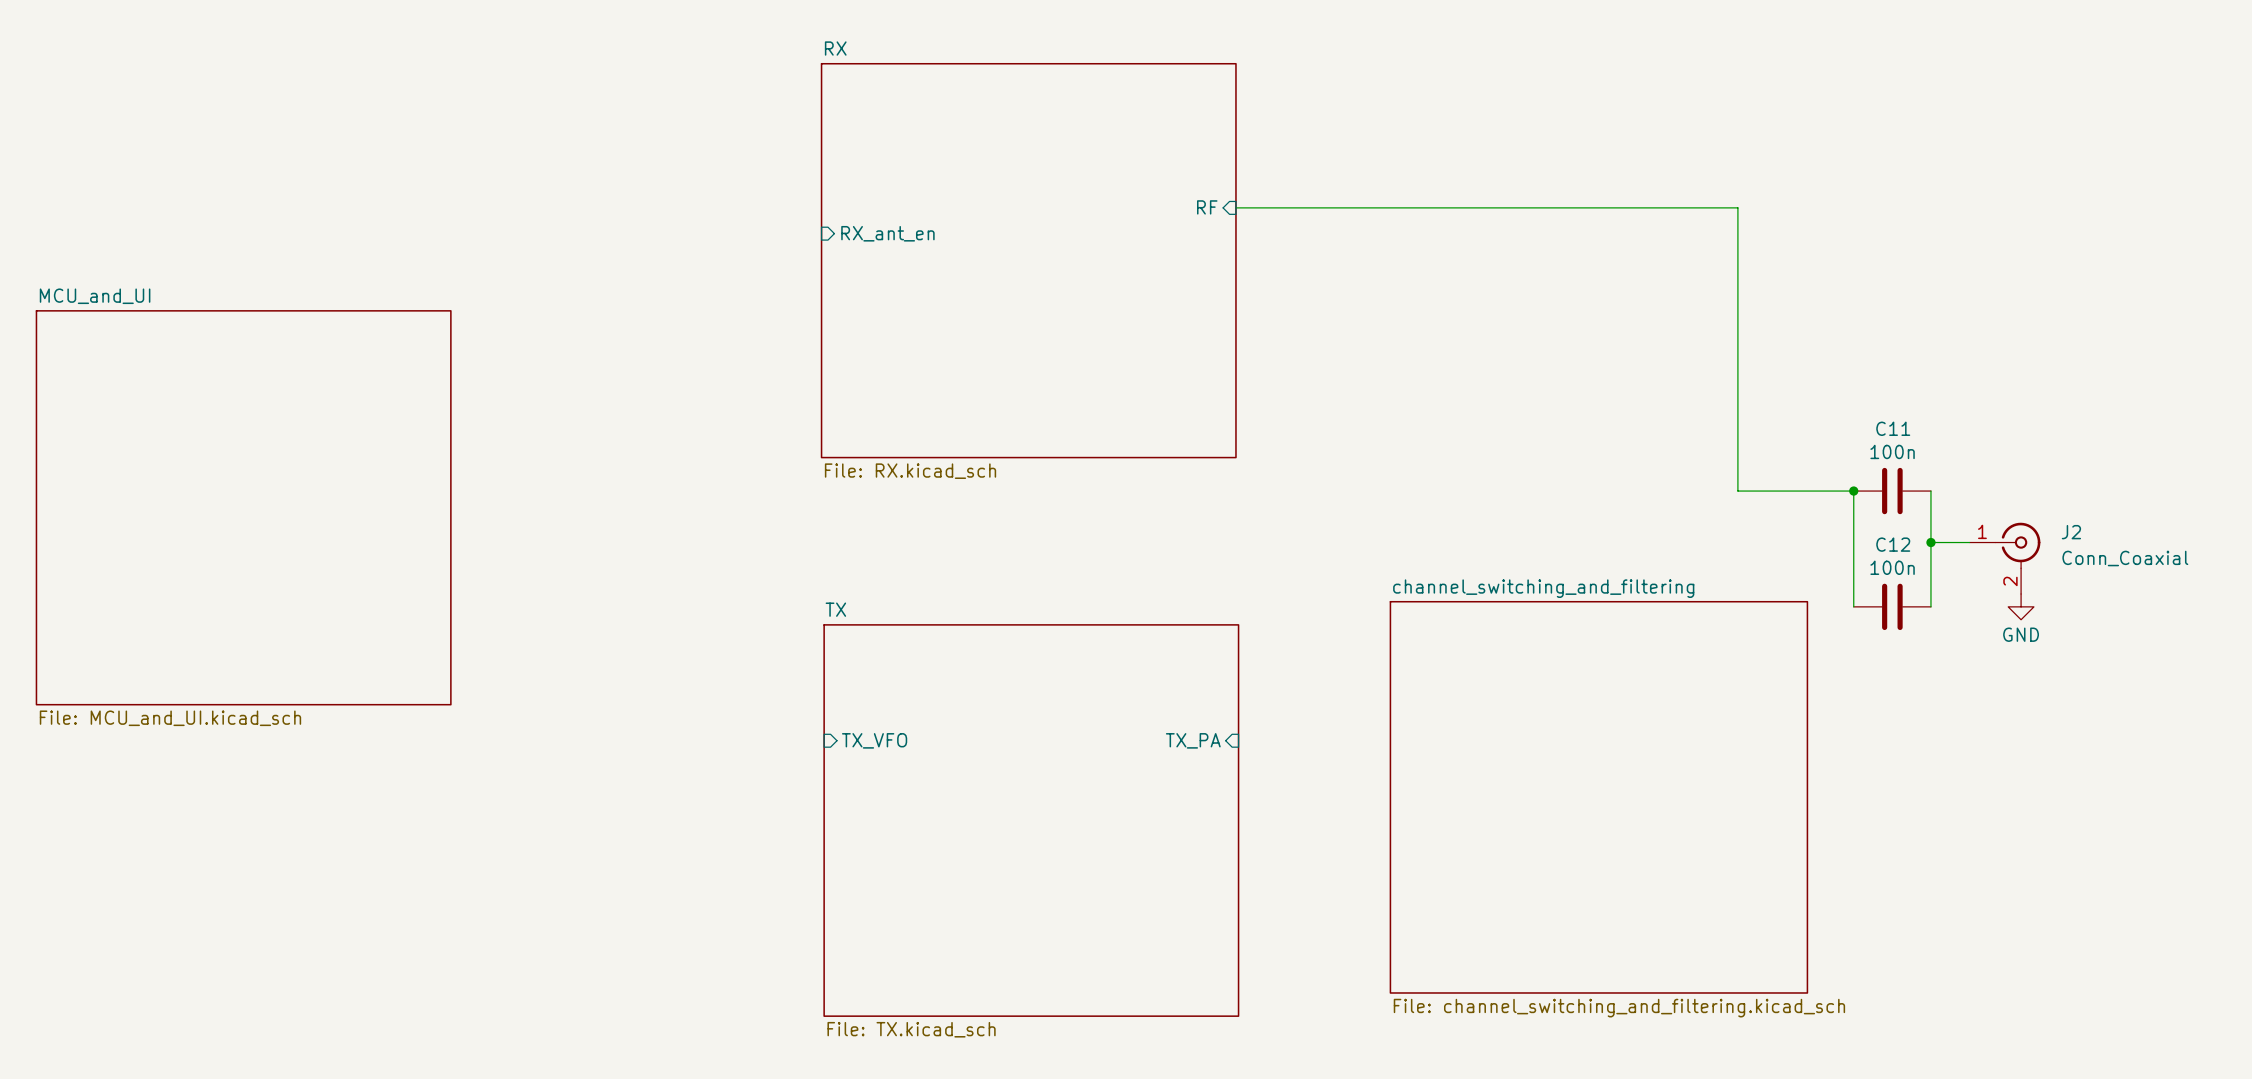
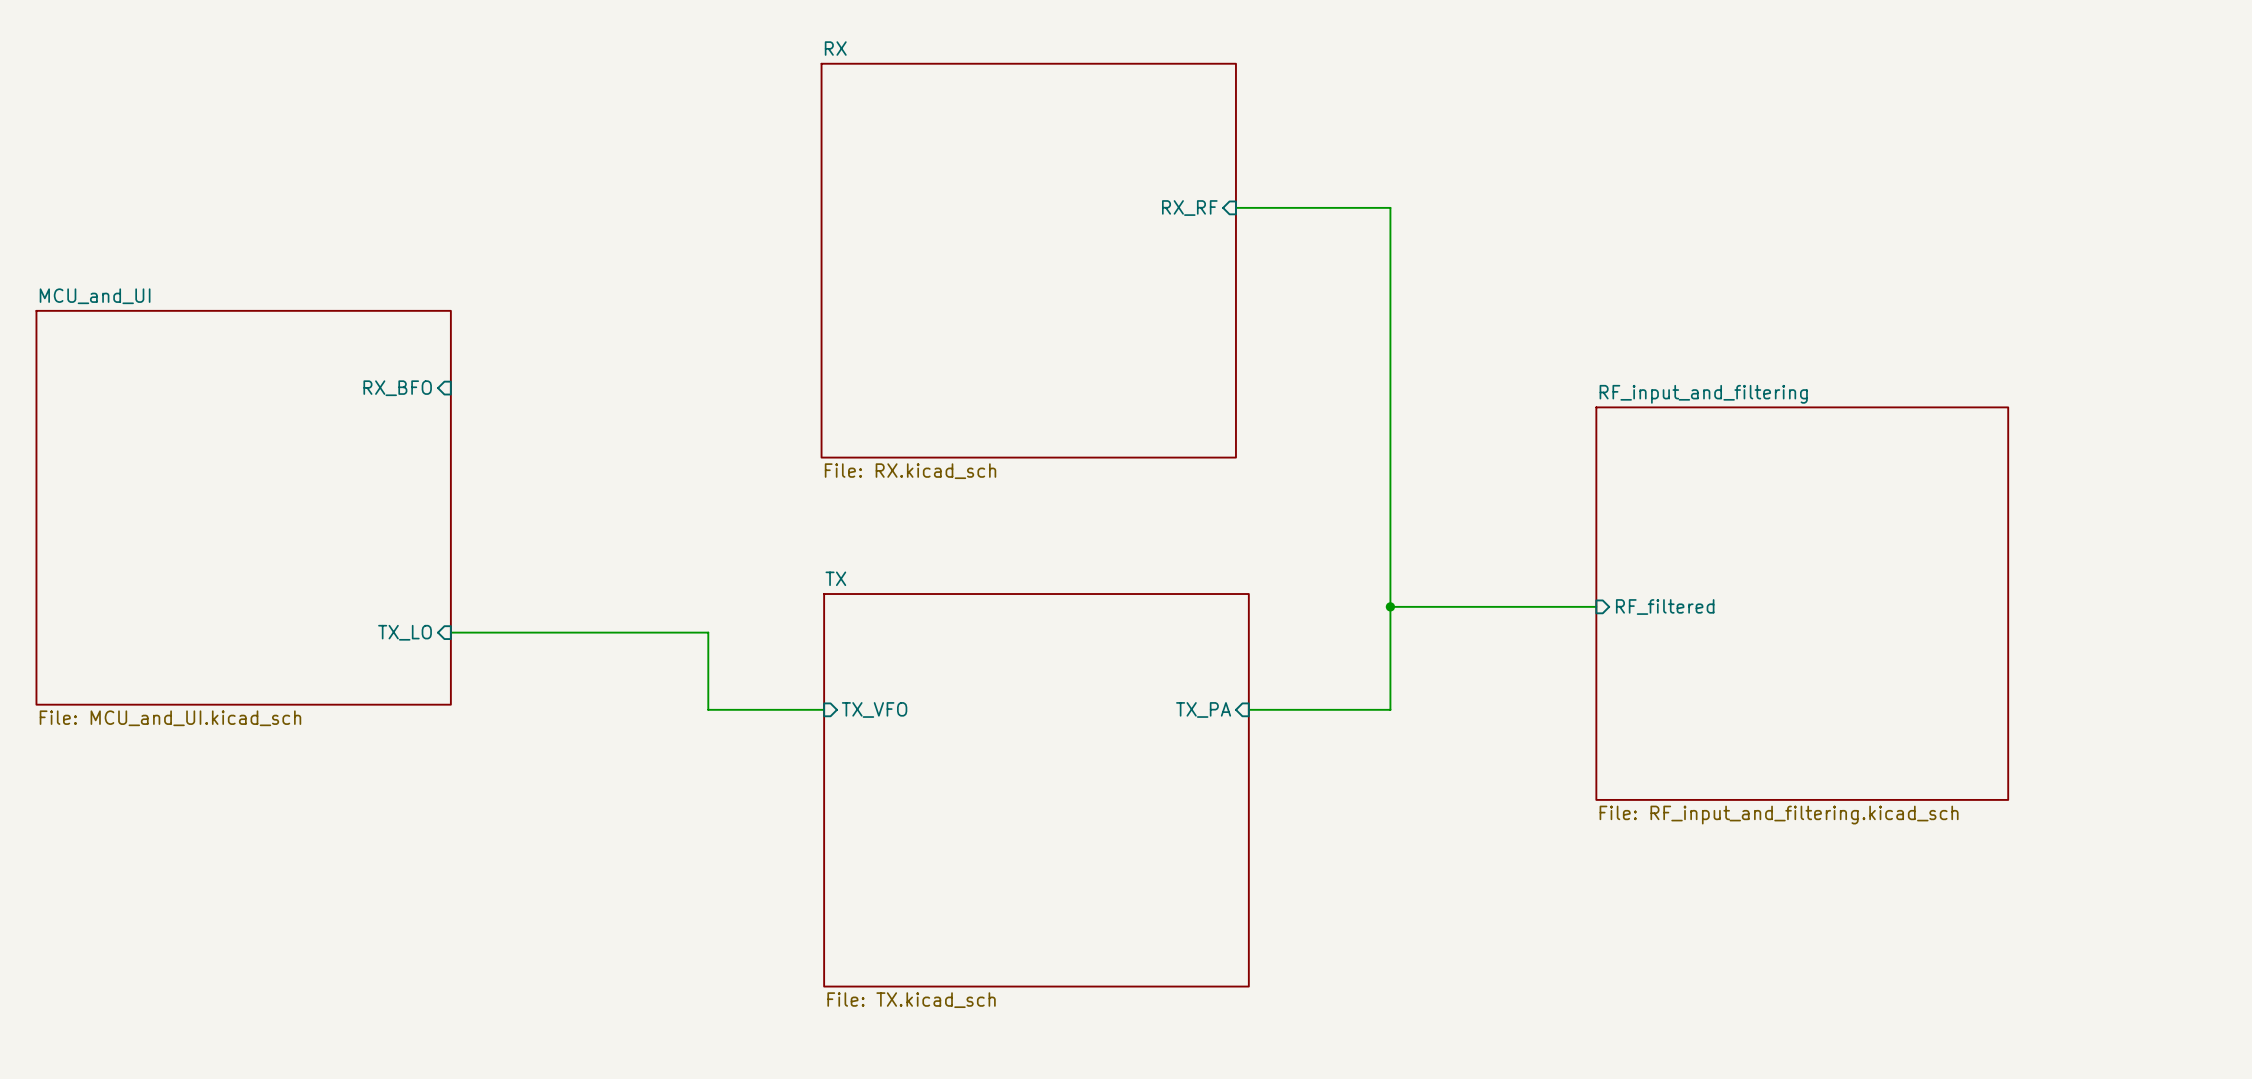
sheet pin: RF (1207, 207) -> RX_RF (1189, 208)
wire: (1390, 207) (1737, 207) (1737, 491) (1853, 491) (1853, 606) -> (1390, 207) (1390, 709) (1248, 709)
sheet pin: RX_ant_en (887, 233) -> none
sheet pin: none -> RX_BFO (397, 388)
junction: (1853, 491) -> none
C11: 100n (1892, 491) -> none
wire: (1930, 491) (1930, 606) -> none
wire: (1930, 542) (1969, 542) -> none
junction: (1930, 542) -> none
J2: Conn_Coaxial (2004, 558) -> none
sheet RF_input_and_filtering: none -> File: RF_input_and_filtering.kicad_sch (1802, 603)
wire: none -> (1390, 606) (1596, 606)
junction: none -> (1390, 606)
C12: 100n (1892, 606) -> none
power symbol: GND (2021, 606) -> none
sheet pin: none -> RF_filtered (1665, 607)
sheet pin: none -> TX_LO (405, 632)
wire: none -> (450, 632) (708, 632) (708, 709) (824, 709)
sheet pin position: TX_VFO (874, 740) -> TX_VFO (874, 709)
sheet pin position: TX_PA (1193, 740) -> TX_PA (1203, 709)
sheet TX: none -> File: TX.kicad_sch (1036, 790)
sheet channel_switching_and_filtering: File: channel_switching_and_filtering.kicad_sch (1598, 797) -> none
sheet TX: File: TX.kicad_sch (1031, 820) -> none

